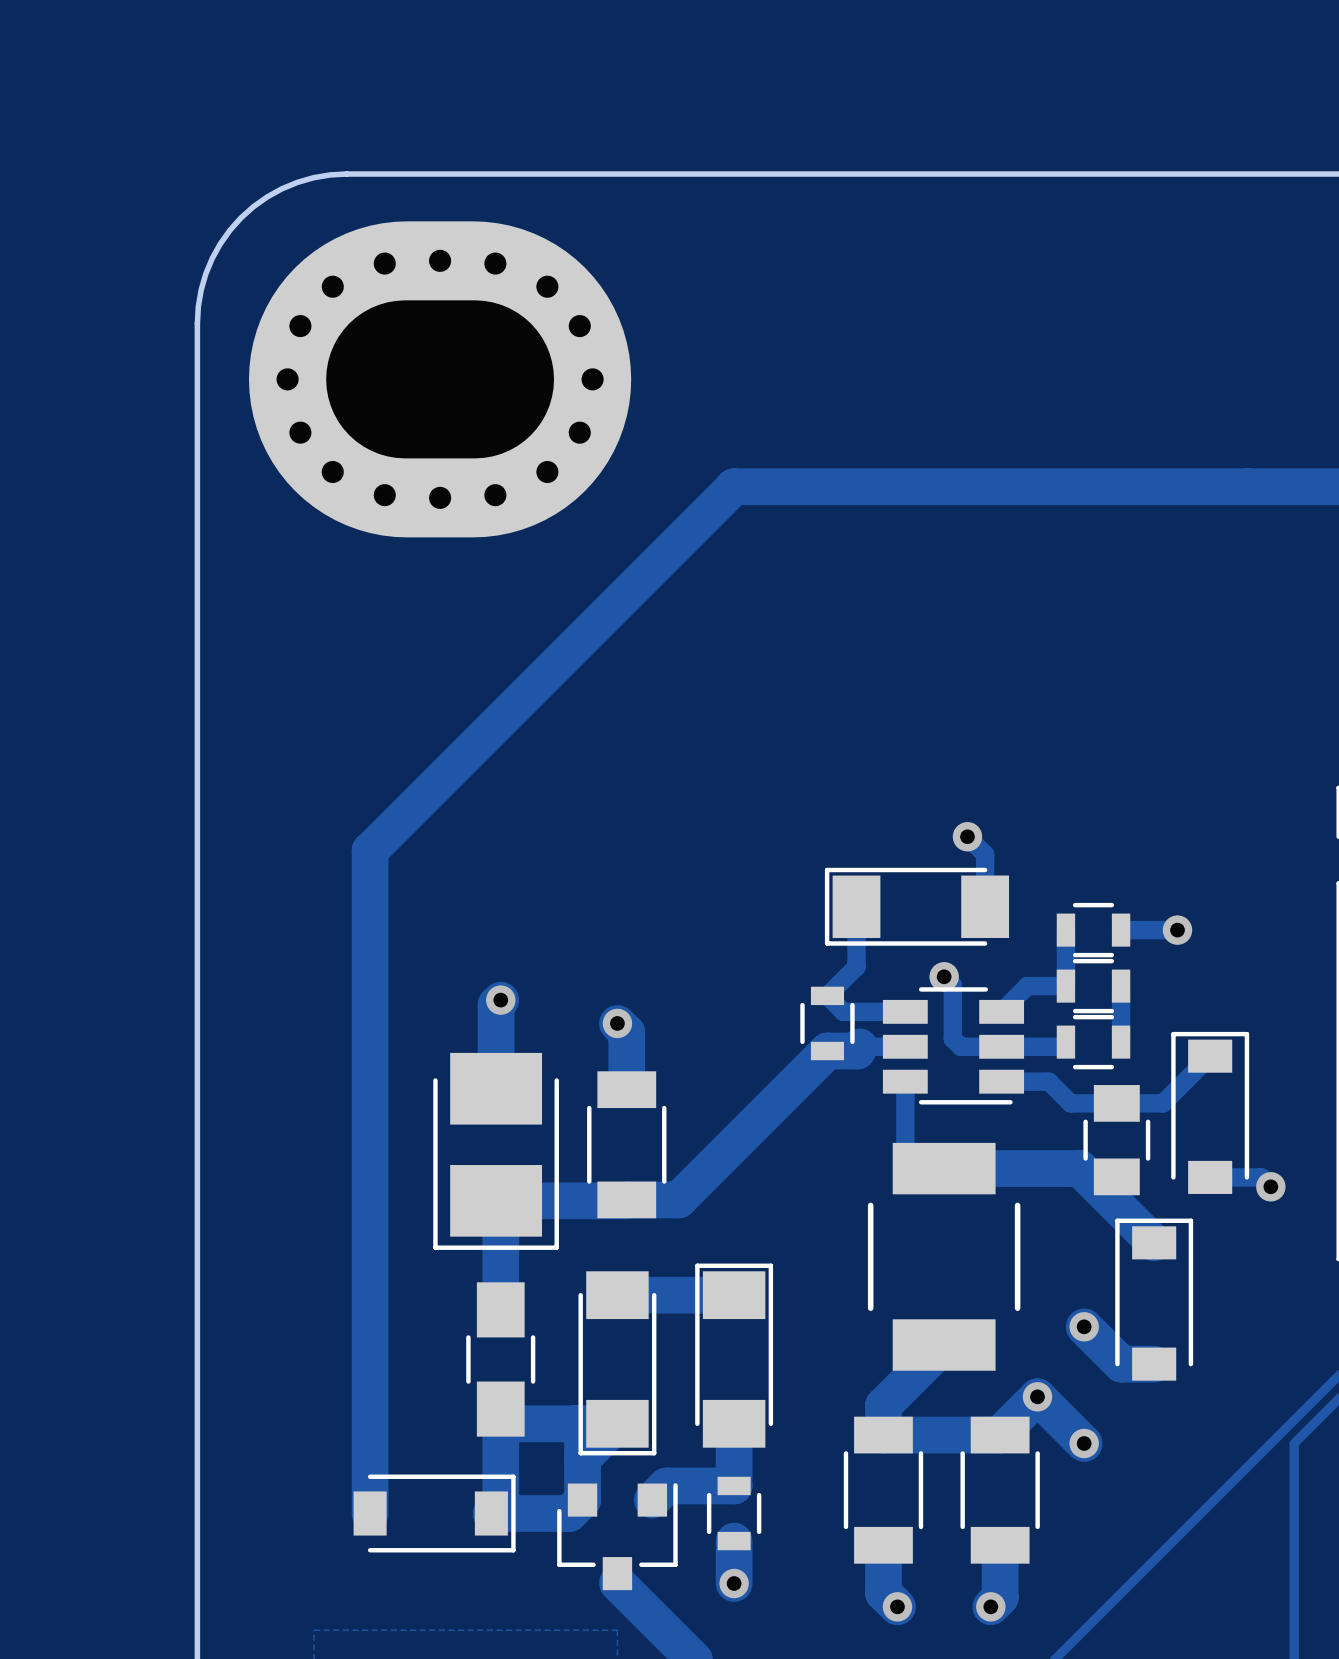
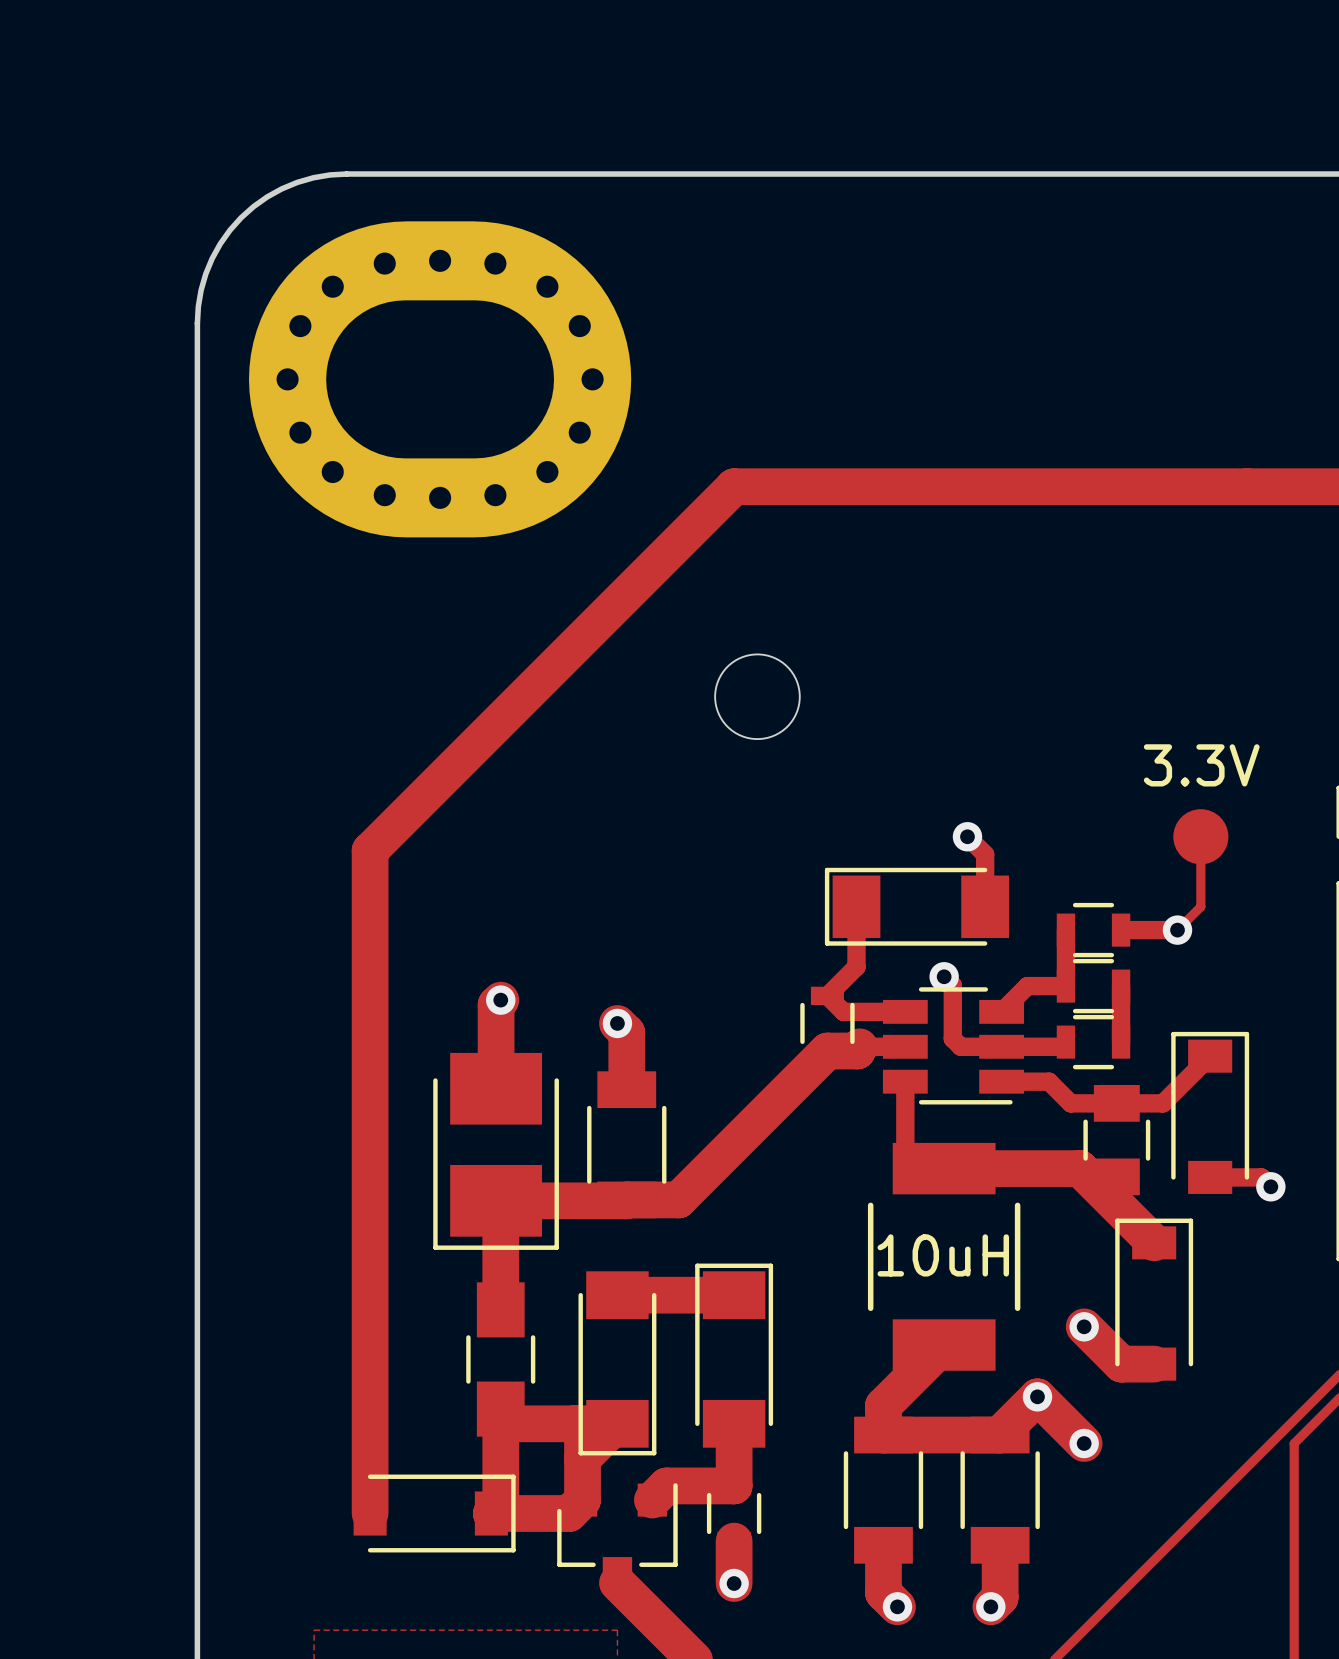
round board edge: none -> [714, 653, 801, 740]
track: none -> (1200, 836) (1200, 906) (1177, 930)
part: none -> 3.3V (1200, 836)
part value: none -> 10uH (943, 1255)

